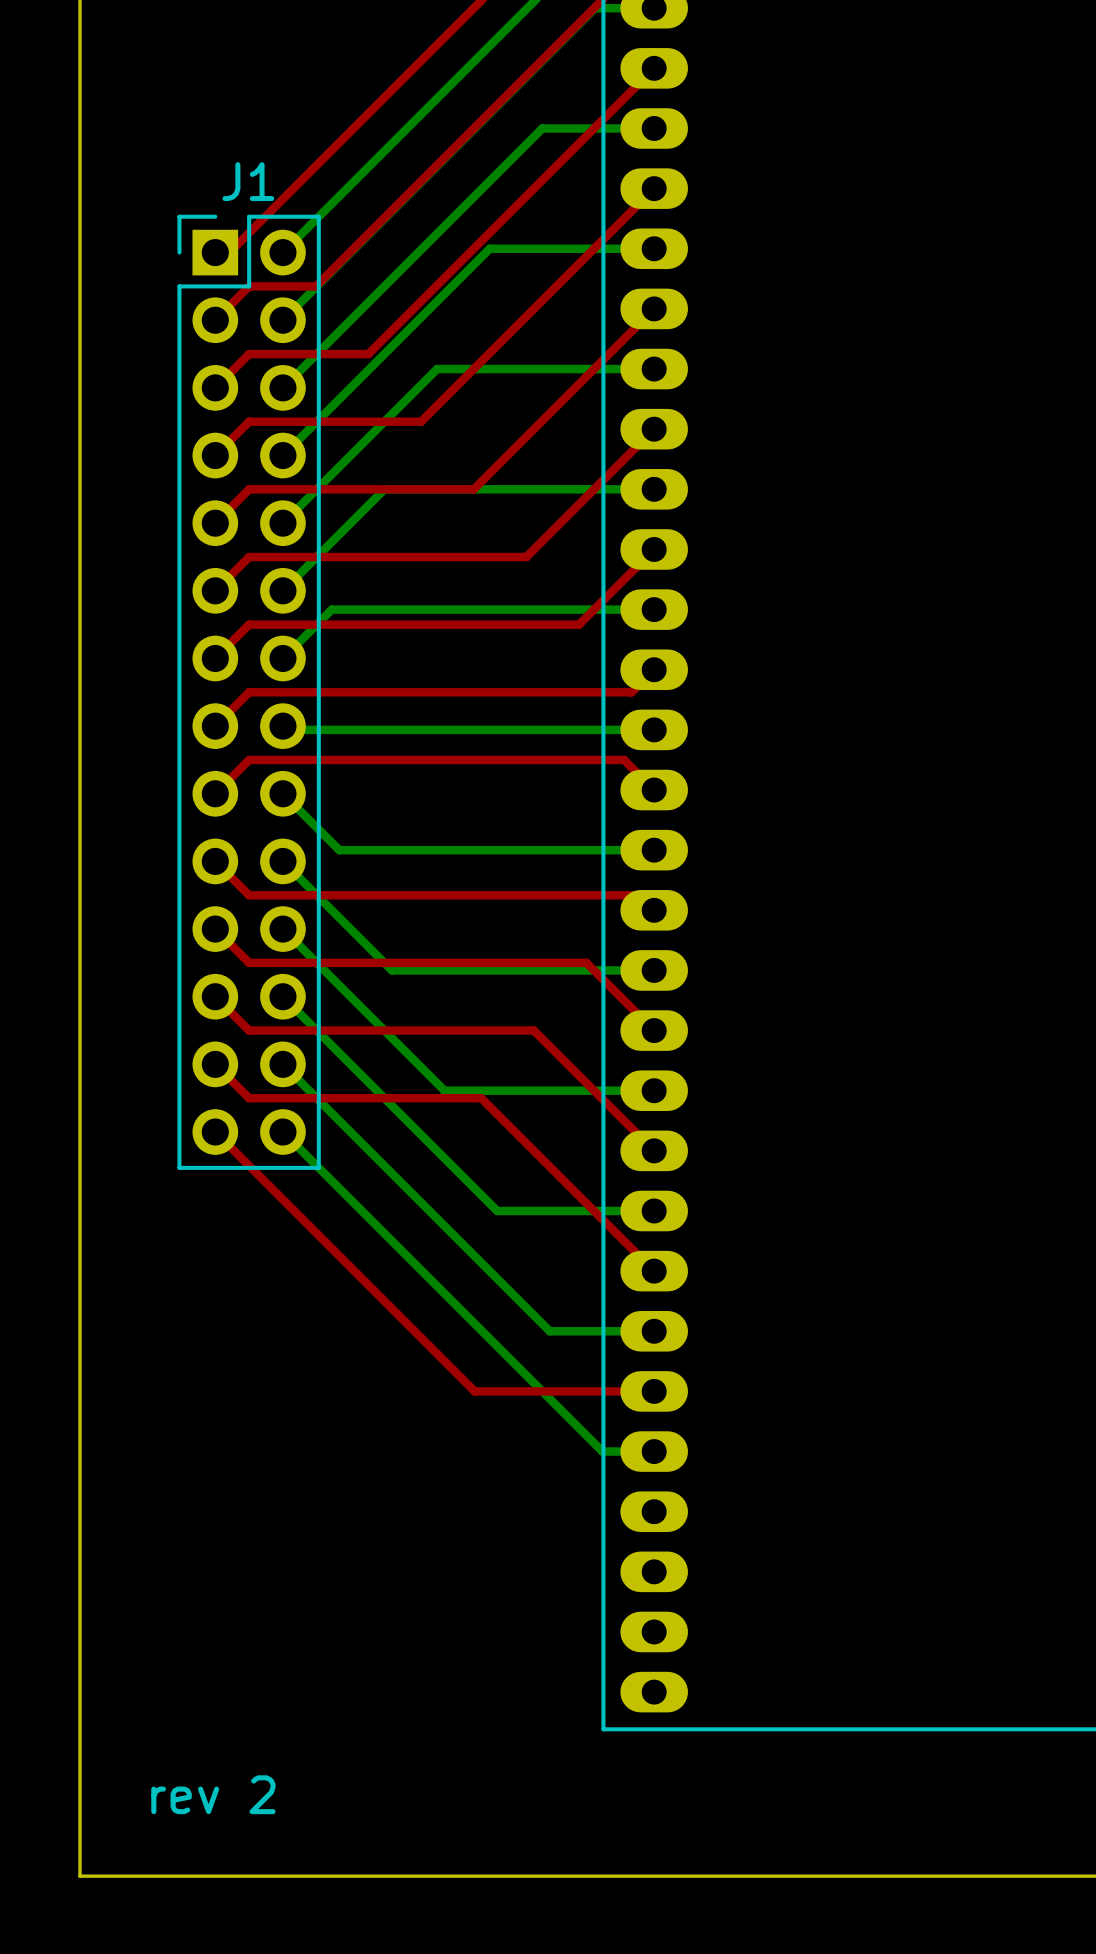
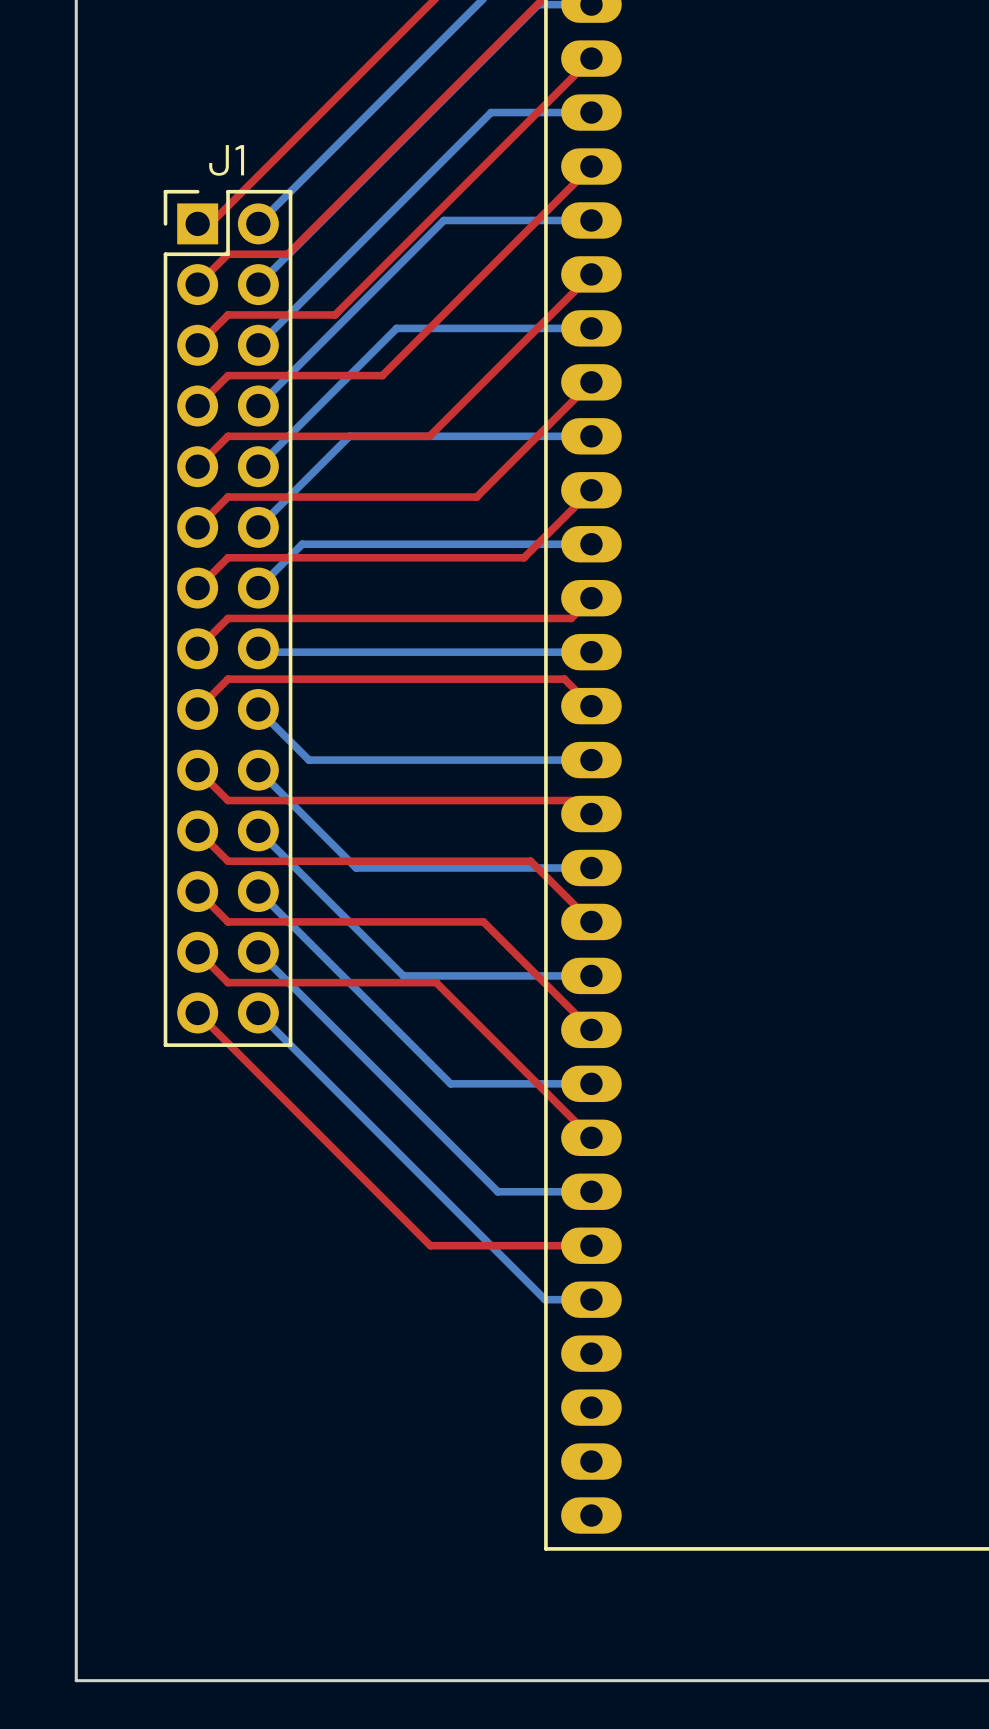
text: rev 2 (213, 1794) -> none

